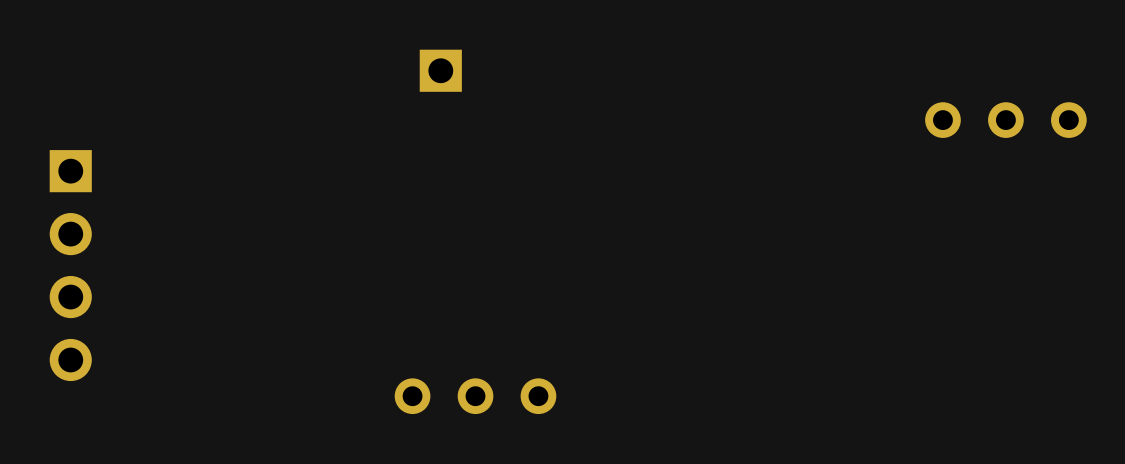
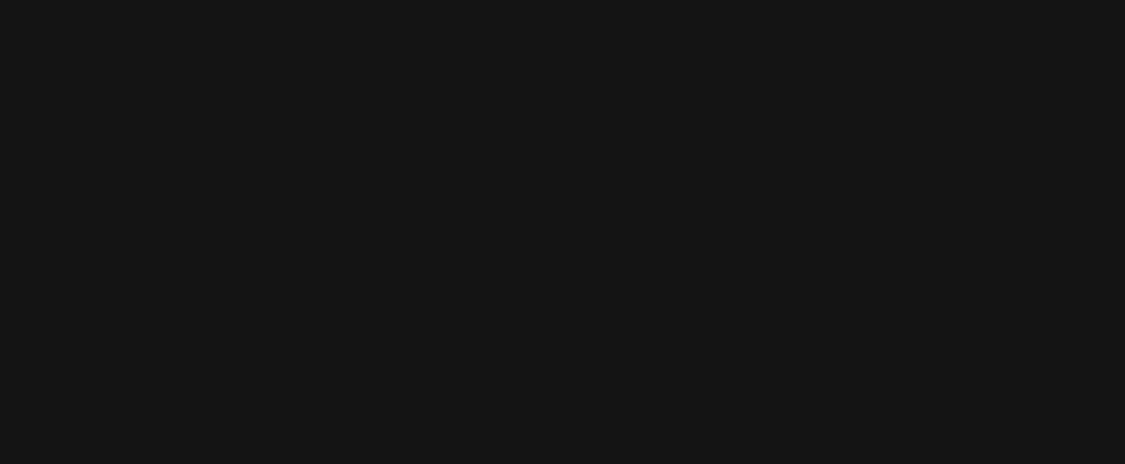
part: (440, 70) -> none
part: (1005, 120) -> none
part: (70, 265) -> none
part: (475, 396) -> none

